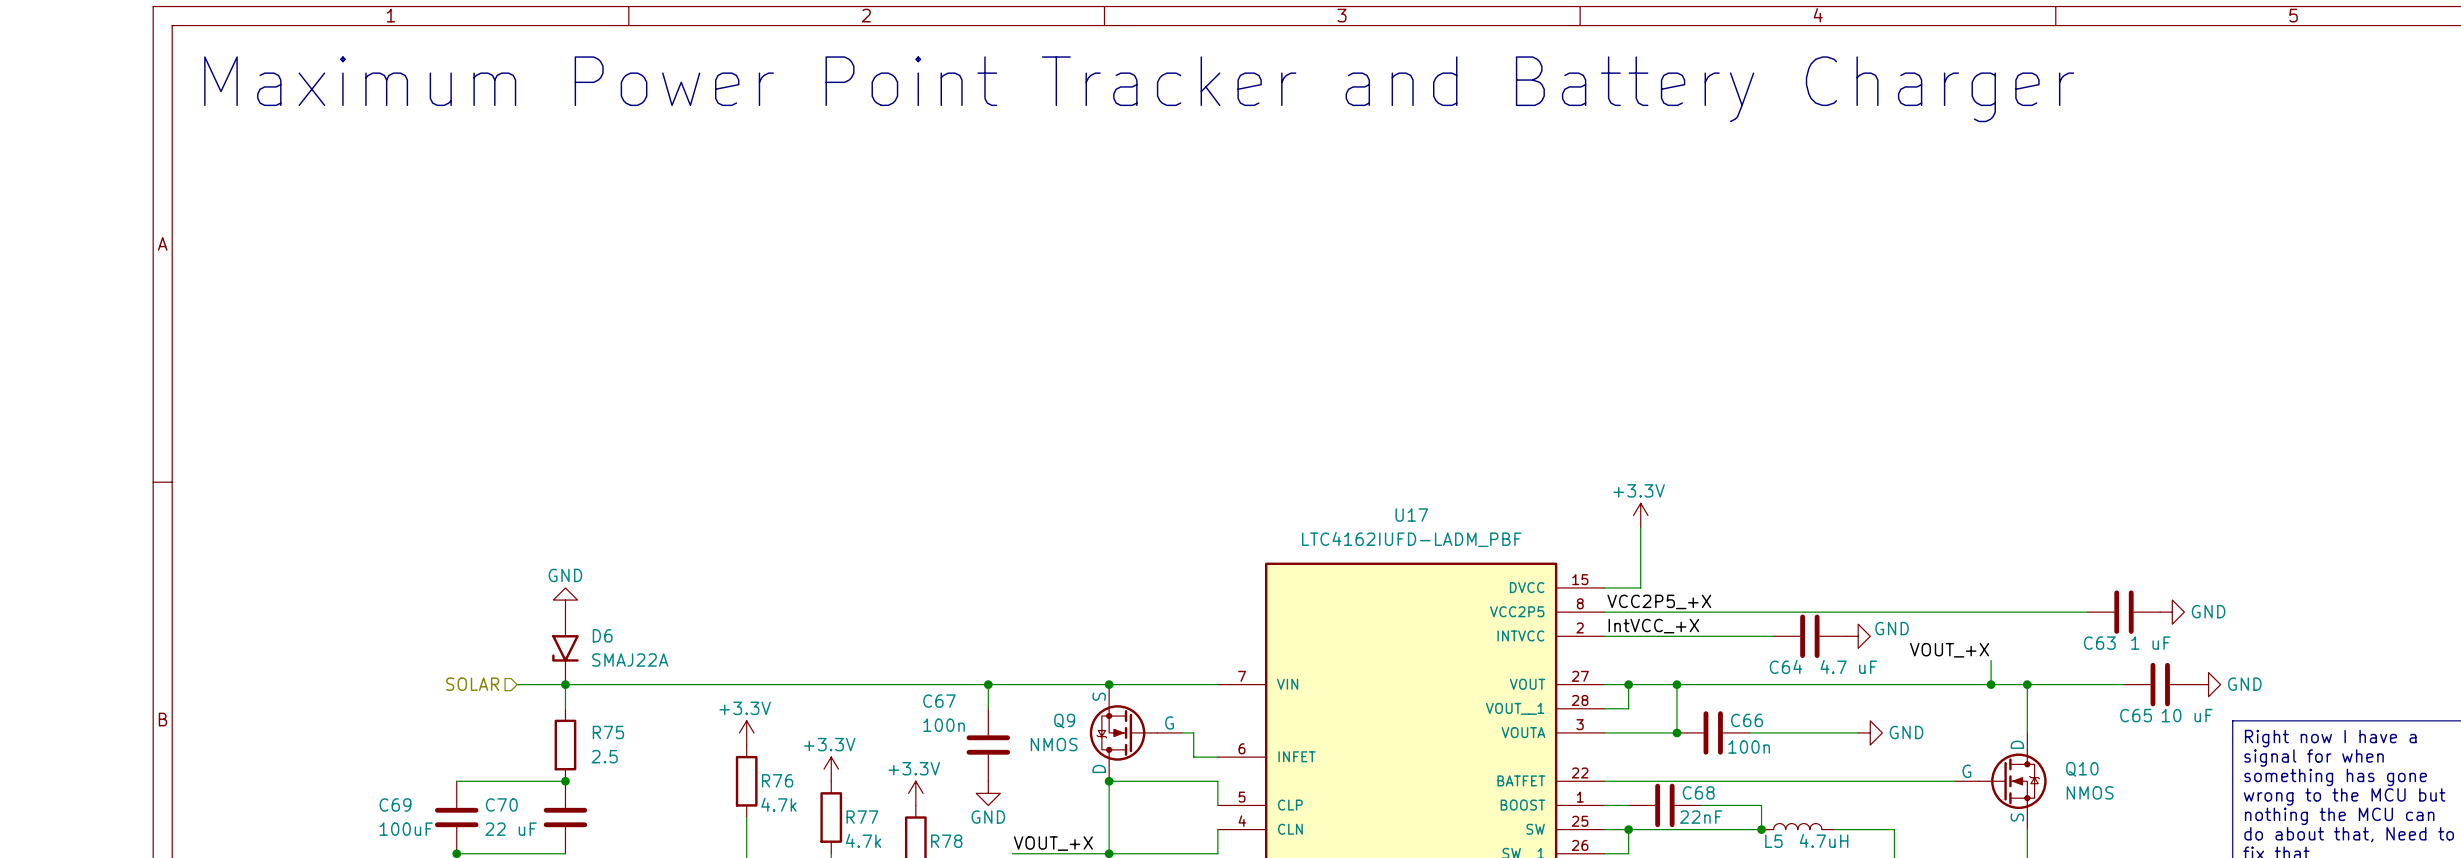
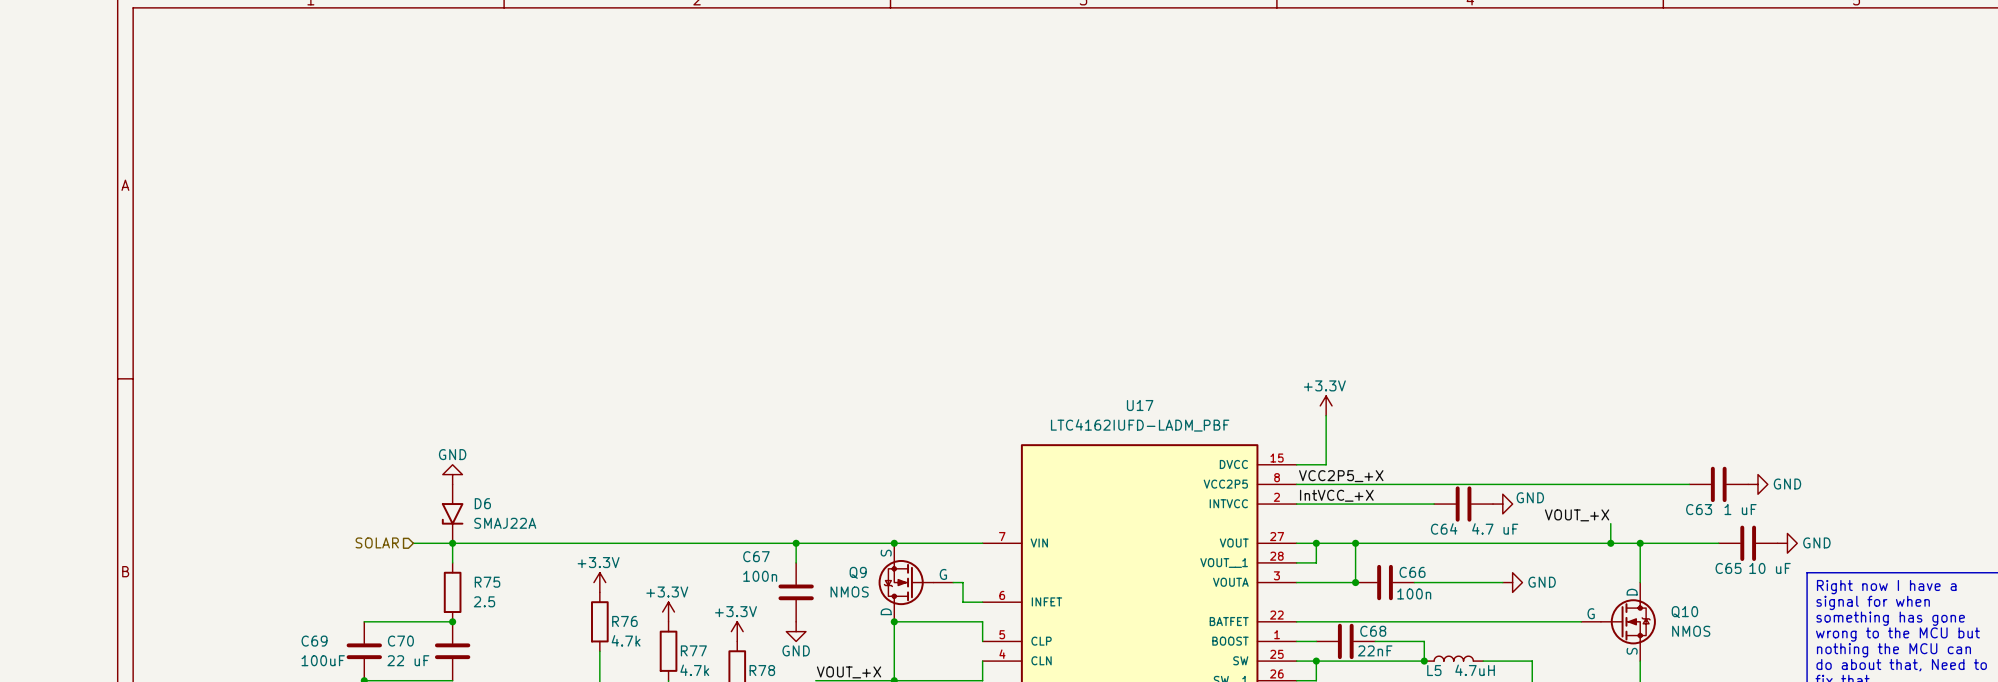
text: Maximum Power Point Tracker and Battery Charger (1139, 89) -> none

